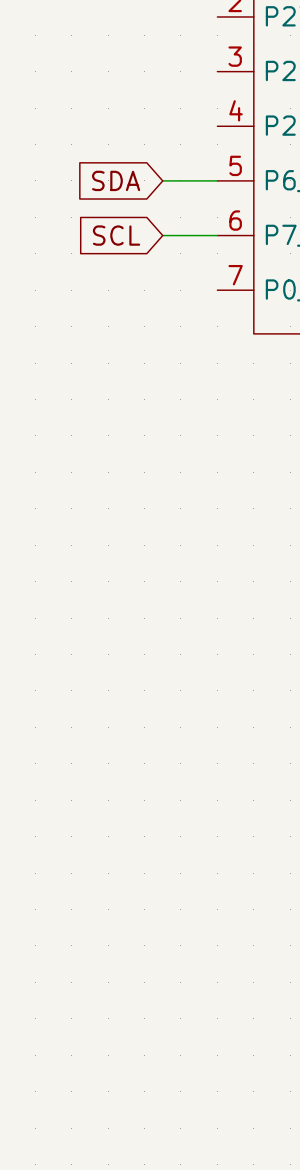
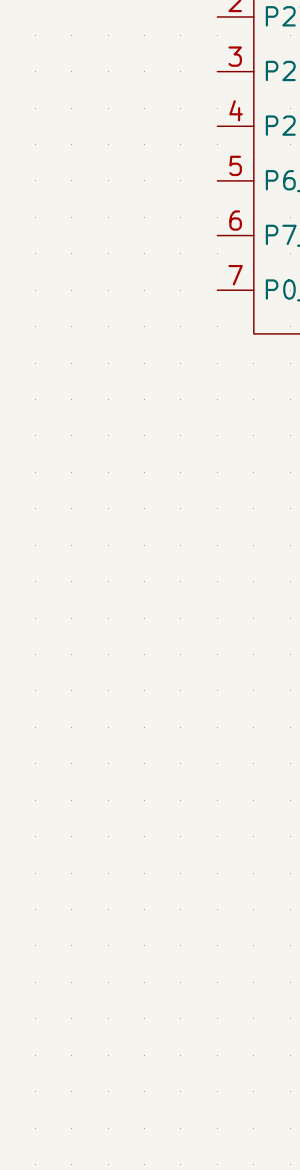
global label: SDA (116, 180) -> none
wire: (162, 180) (217, 180) -> none
global label: SCL (116, 235) -> none
wire: (162, 235) (217, 235) -> none

